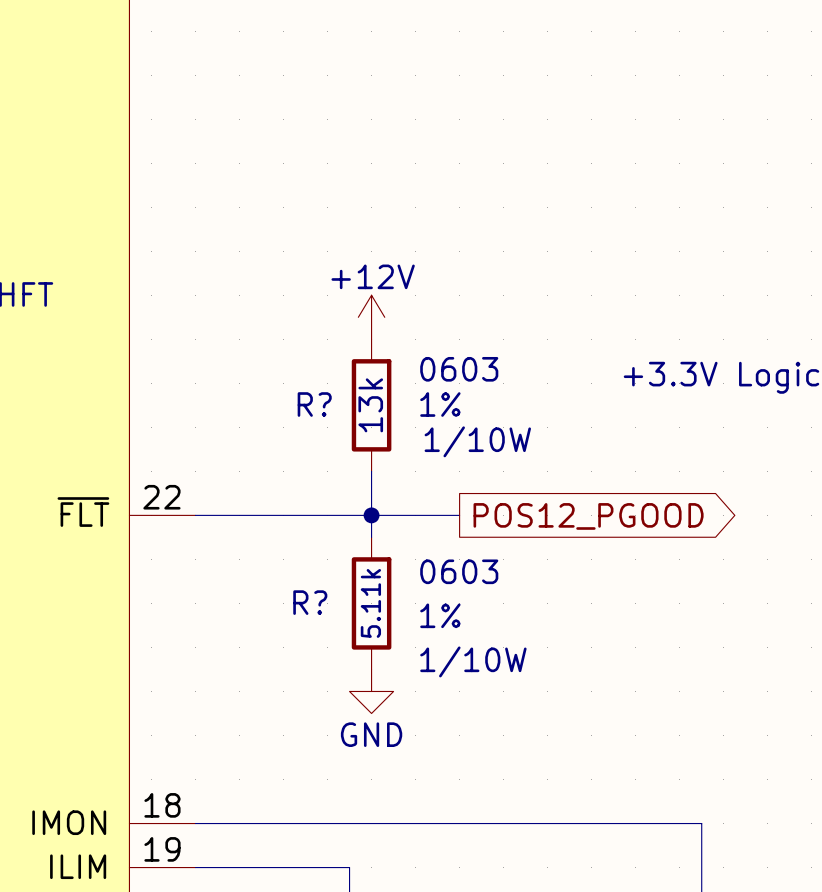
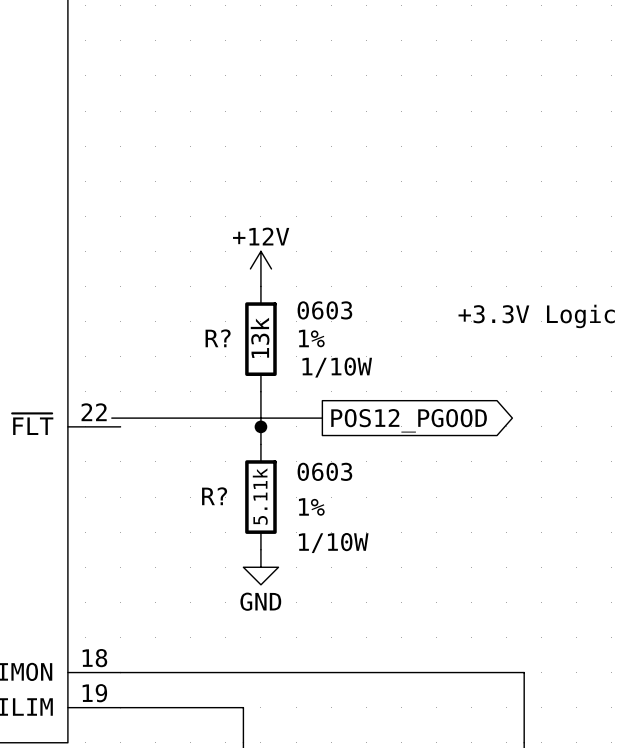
wire: (195, 515) (459, 515) -> (111, 418) (322, 418)
global label position: POS12_PGOOD (588, 516) -> POS12_PGOOD (409, 420)

